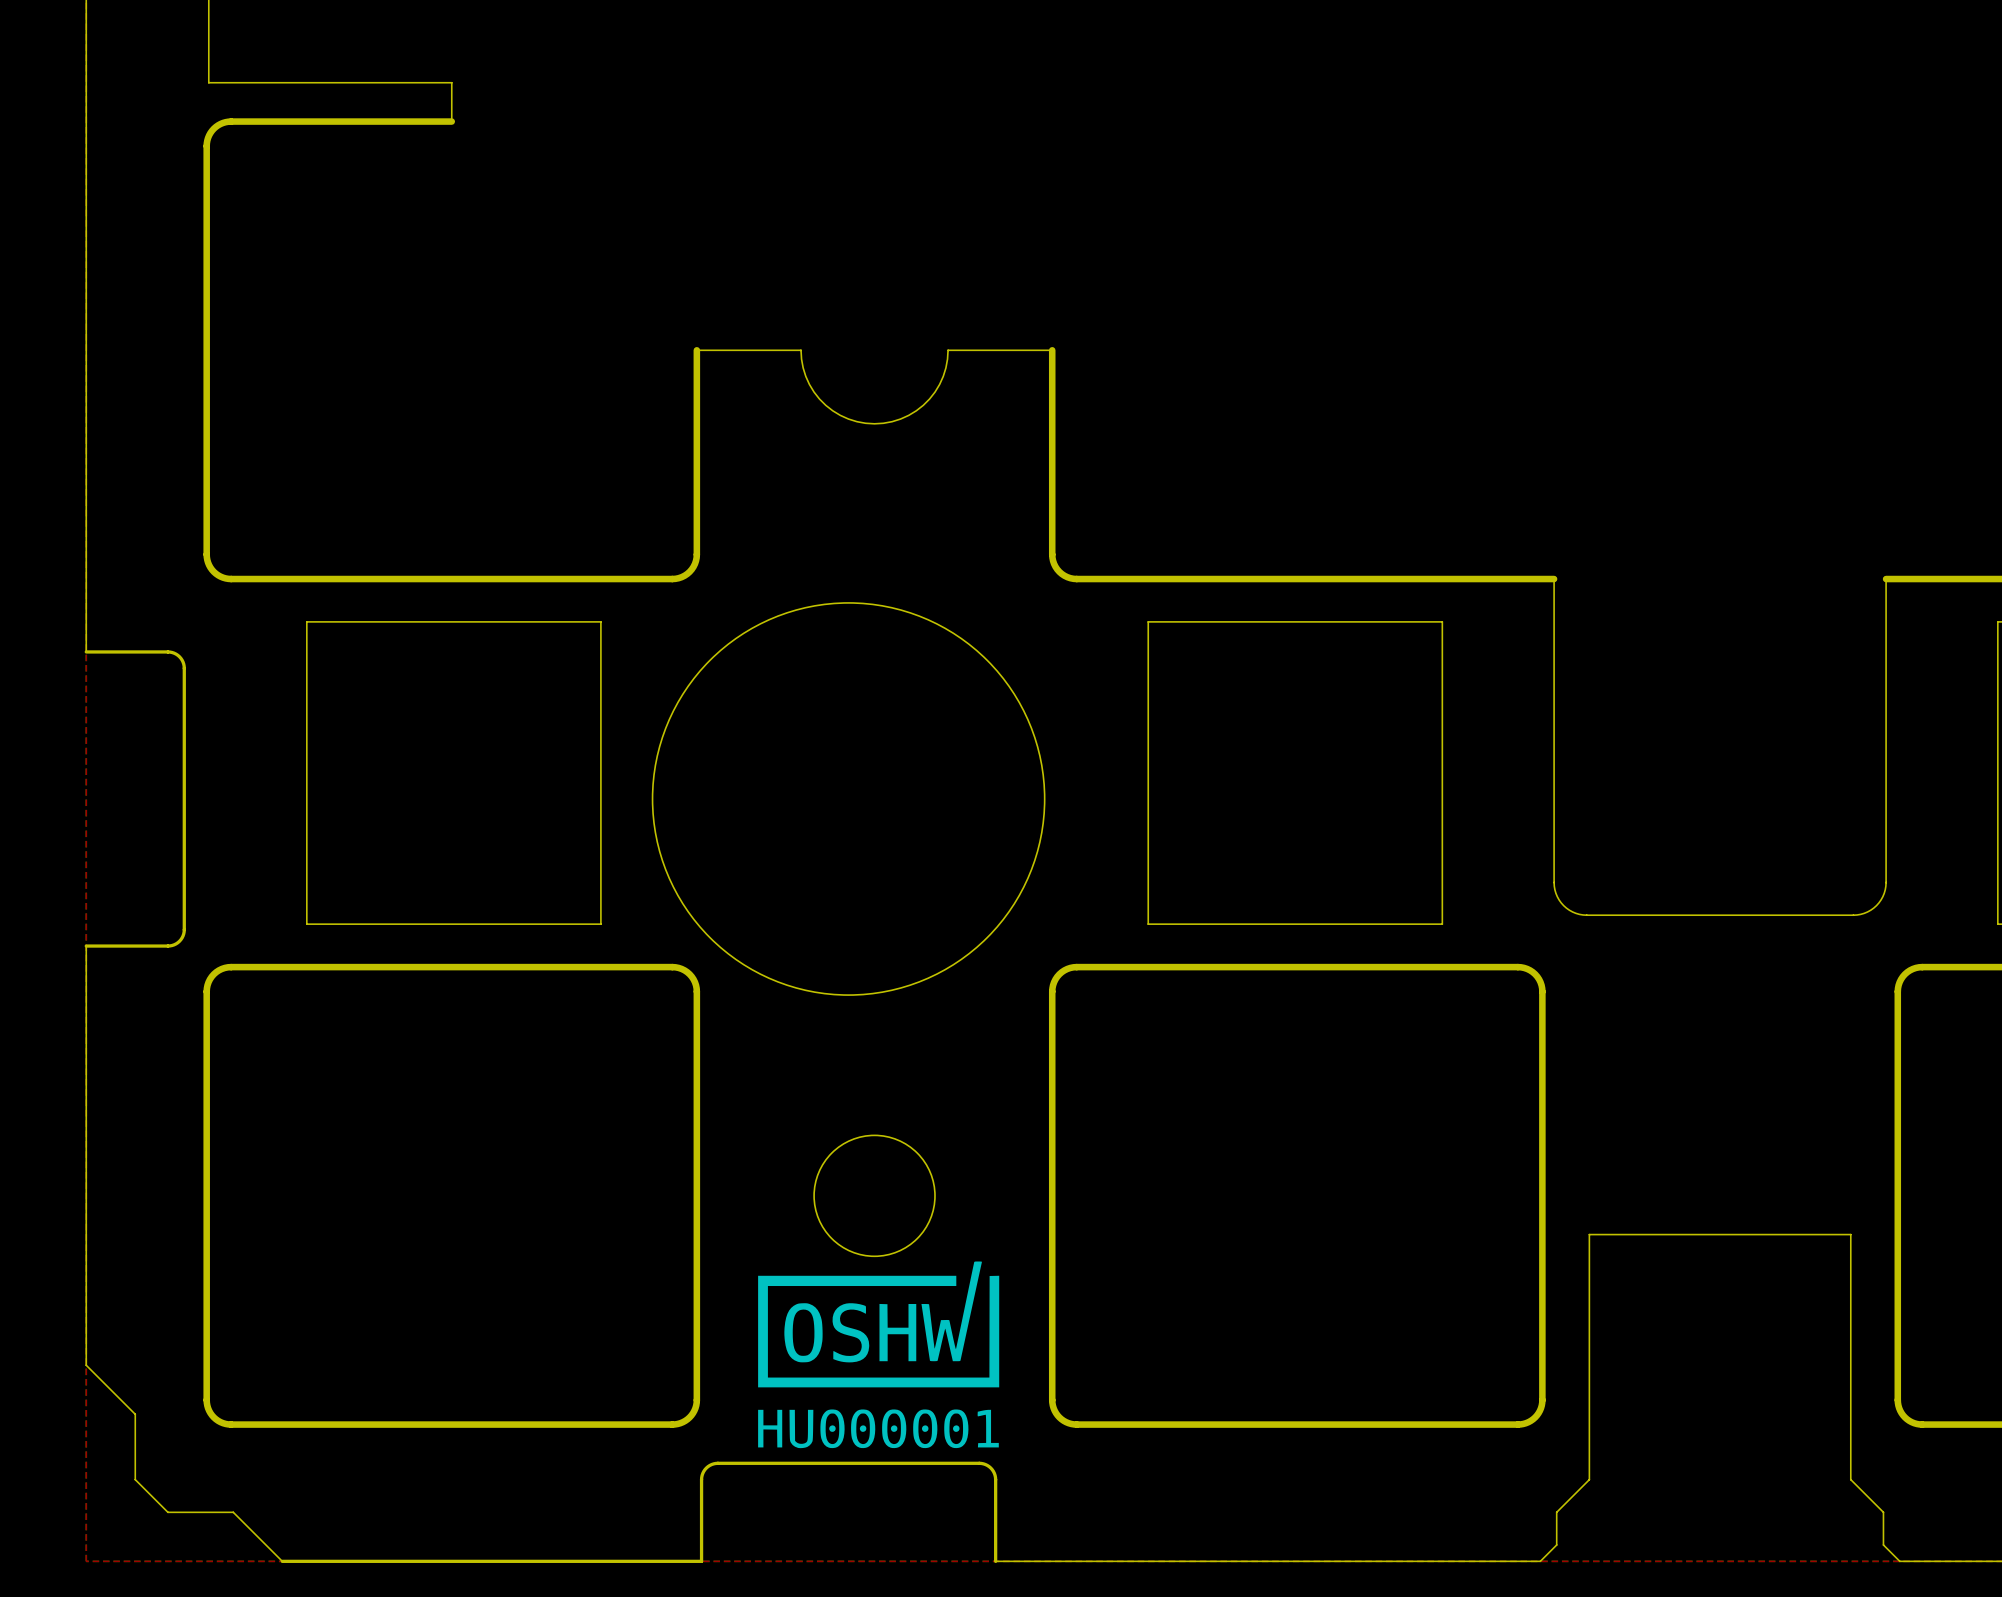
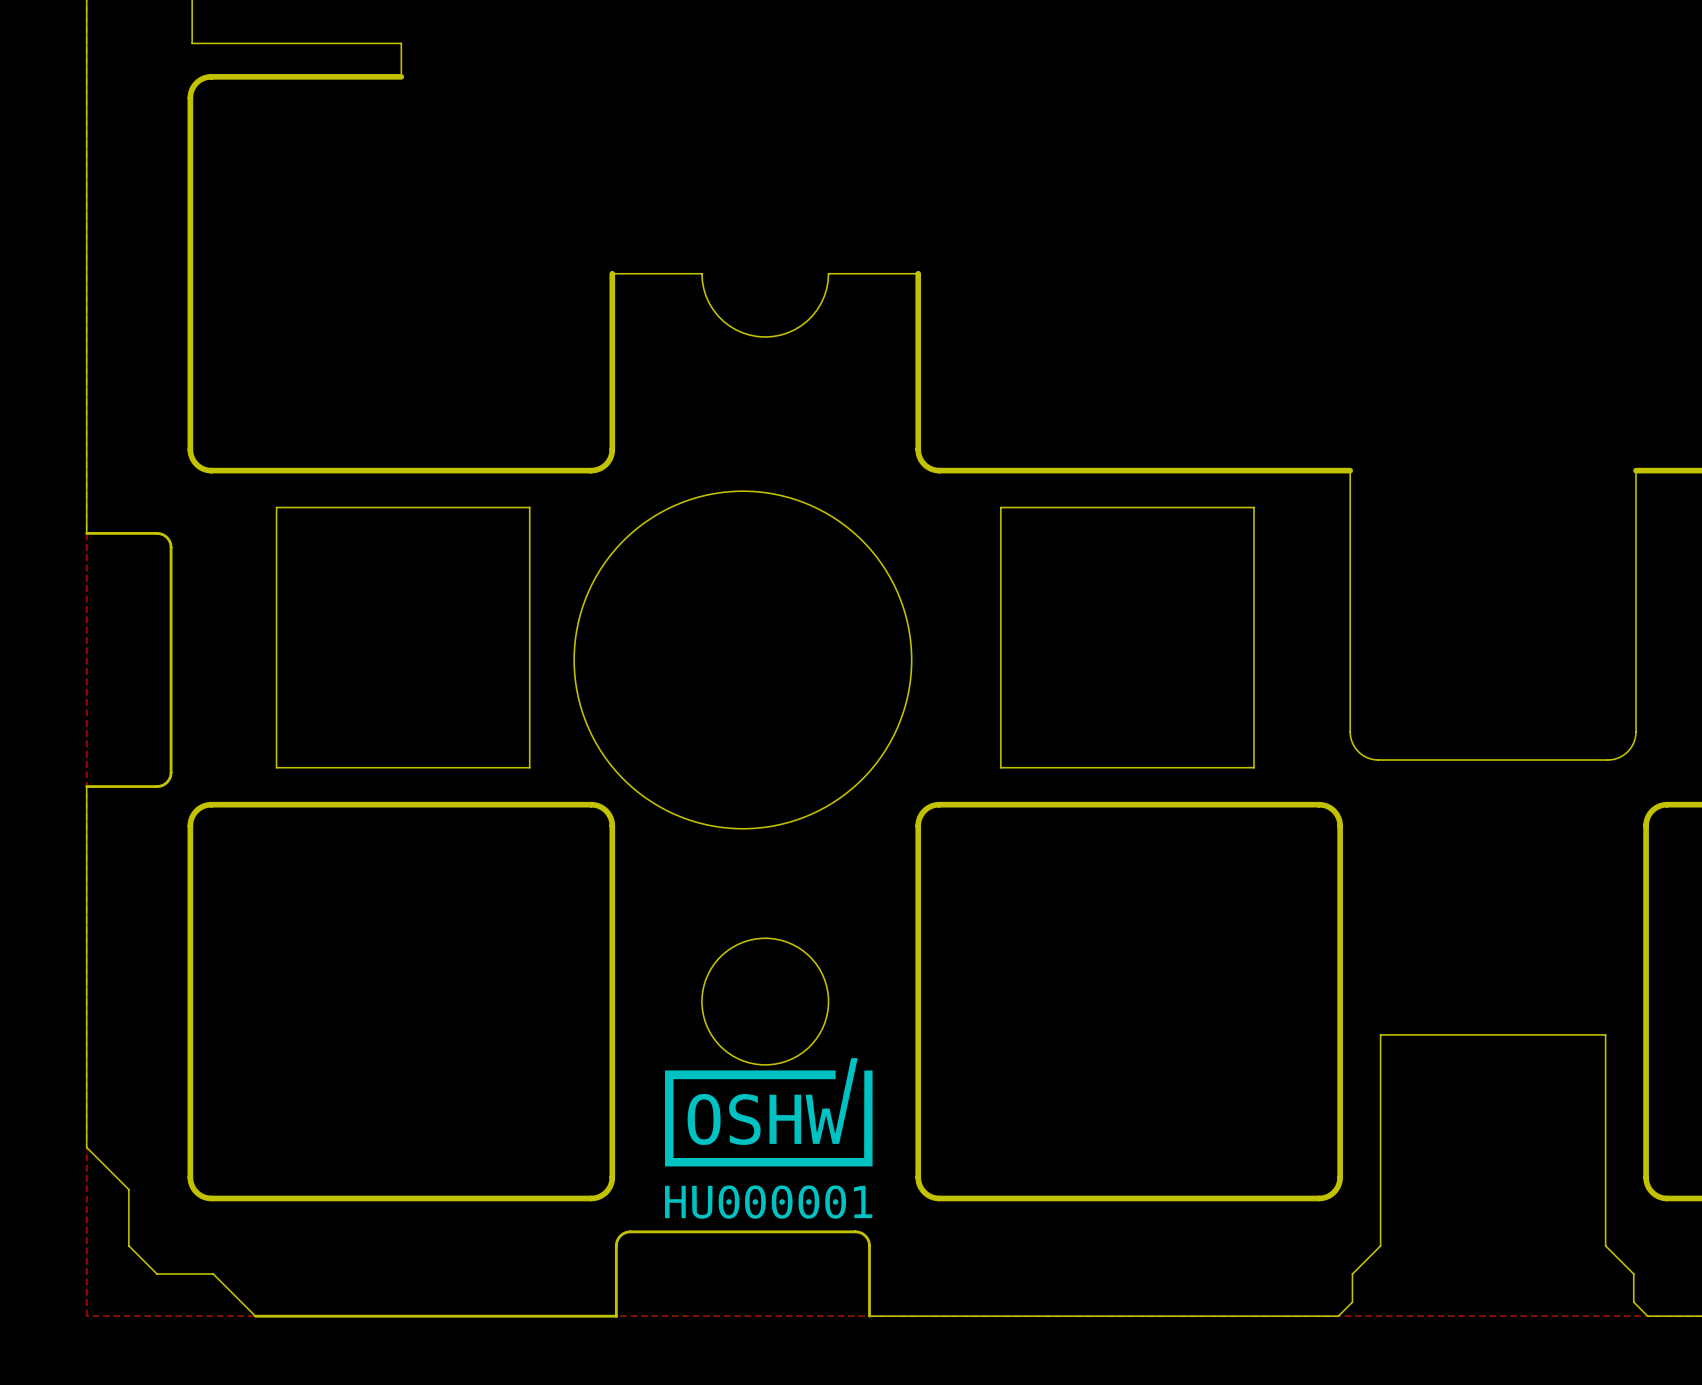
round board edge size: [813, 1134, 936, 1258] -> [701, 937, 830, 1066]

